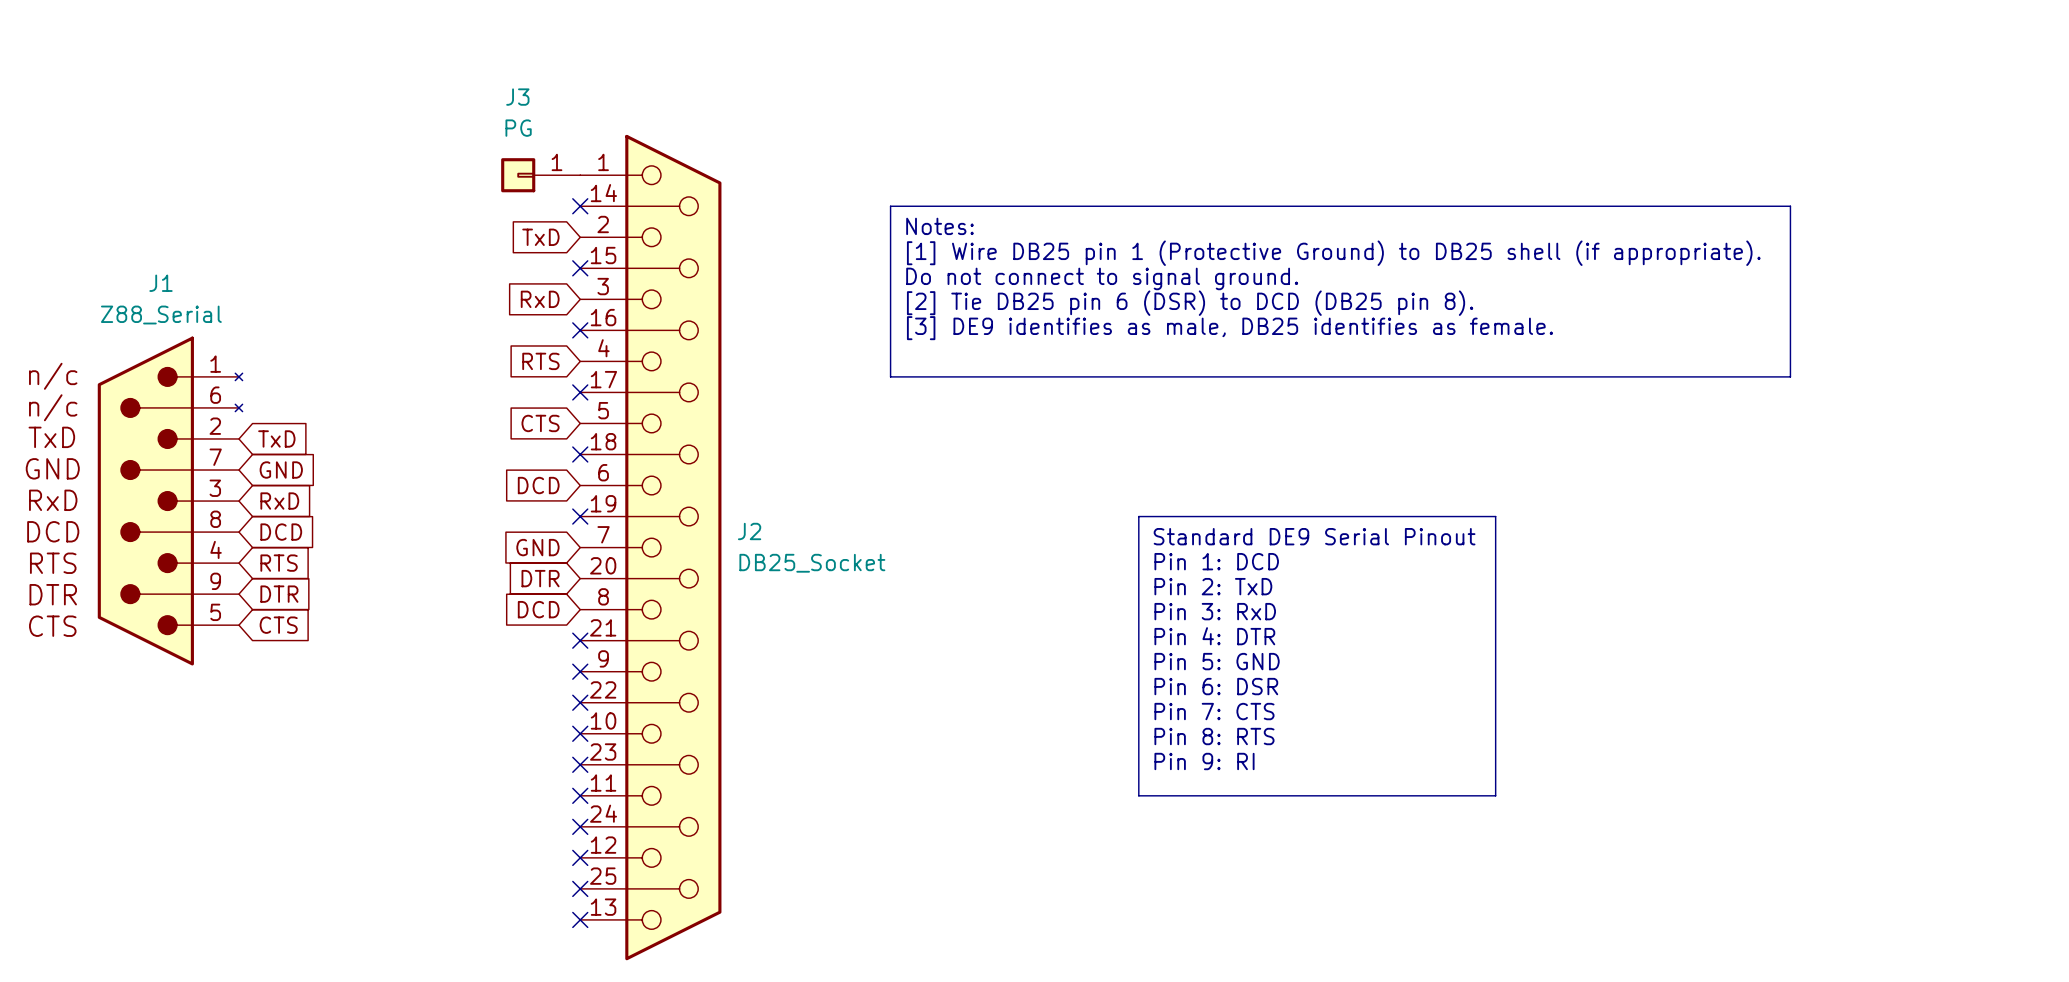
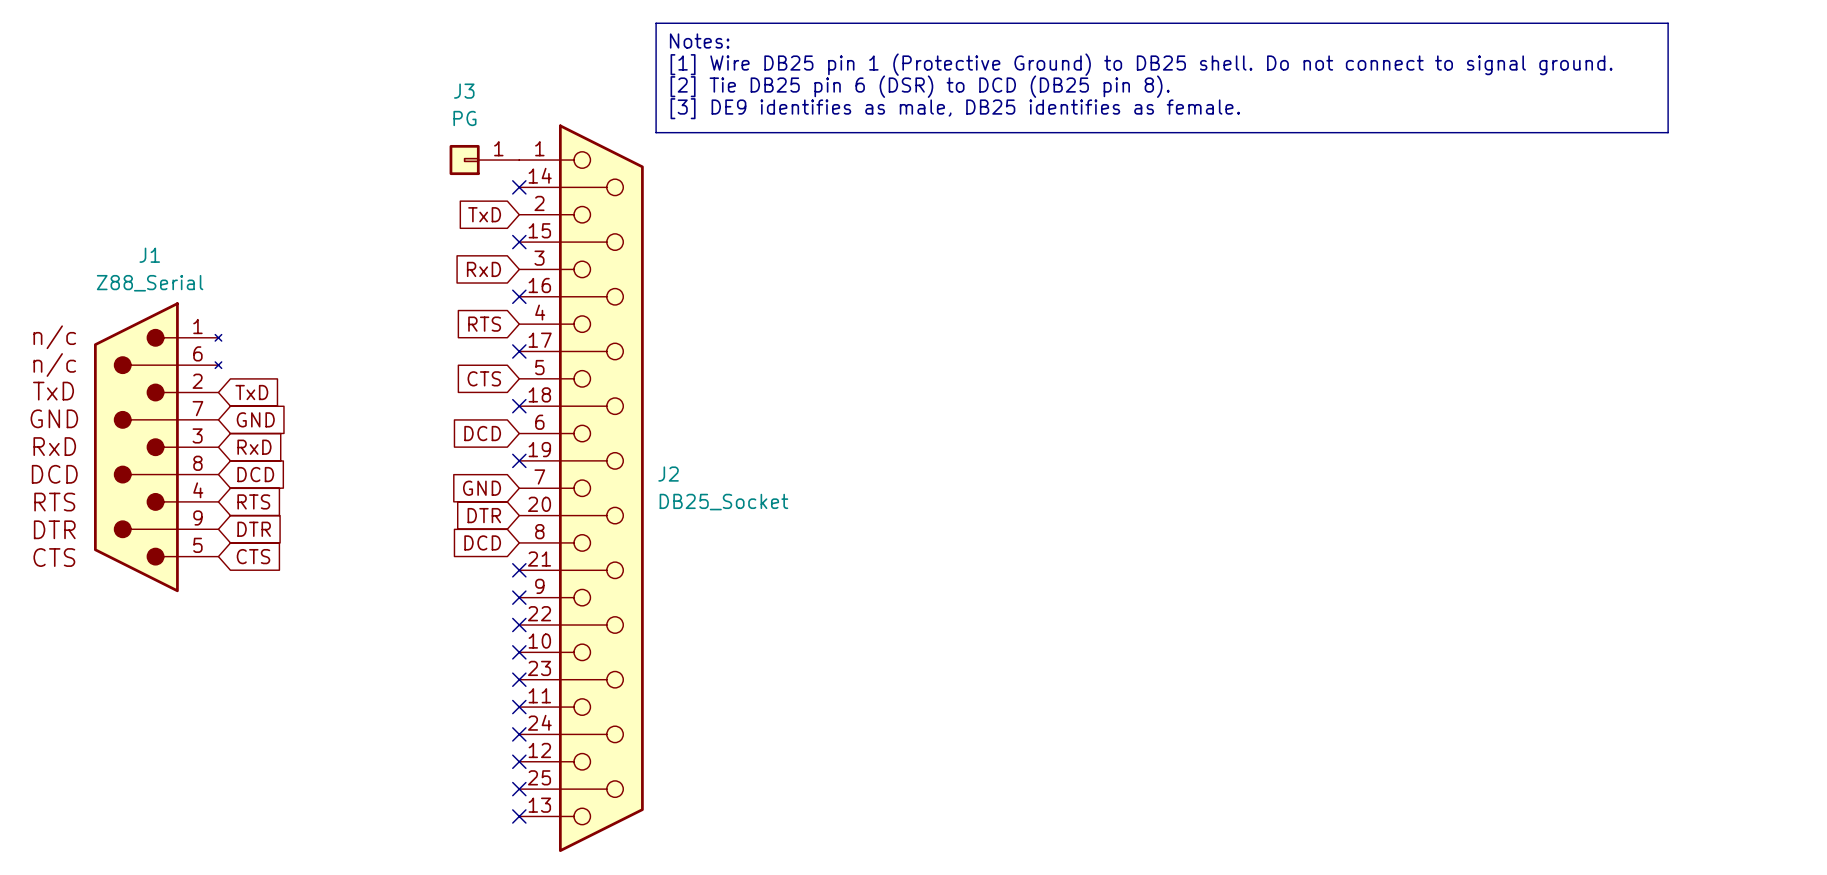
line: none -> (656, 23) (1668, 23) (1668, 132) (656, 132) (656, 23)
text: none -> [1] Wire DB25 pin 1 (Protective Ground) to DB25 shell. Do not connect to signal ground. (1141, 64)
line: (890, 206) (1790, 206) (1790, 376) (890, 376) (890, 206) -> none
text position: Notes: (940, 226) -> Notes: (699, 41)
text: [1] Wire DB25 pin 1 (Protective Ground) to DB25 shell (if appropriate). (1333, 253) -> none
text: Do not connect to signal ground. (1102, 278) -> none
text position: [2] Tie DB25 pin 6 (DSR) to DCD (DB25 pin 8). (1190, 303) -> [2] Tie DB25 pin 6 (DSR) to DCD (DB25 pin 8). (920, 86)
text position: [3] DE9 identifies as male, DB25 identifies as female. (1229, 328) -> [3] DE9 identifies as male, DB25 identifies as female. (955, 108)
line: (1138, 516) (1495, 516) (1495, 795) (1138, 795) (1138, 516) -> none
text: Standard DE9 Serial Pinout (1314, 536) -> none
text: Pin 1: DCD (1216, 561) -> none
text: Pin 2: TxD (1213, 586) -> none
text: Pin 3: RxD (1215, 611) -> none
text: Pin 4: DTR (1214, 636) -> none
text: Pin 5: GND (1217, 661) -> none
text: Pin 6: DSR (1216, 686) -> none
text: Pin 7: CTS (1214, 711) -> none
text: Pin 8: RTS (1214, 736) -> none
text: Pin 9: RI (1204, 761) -> none

